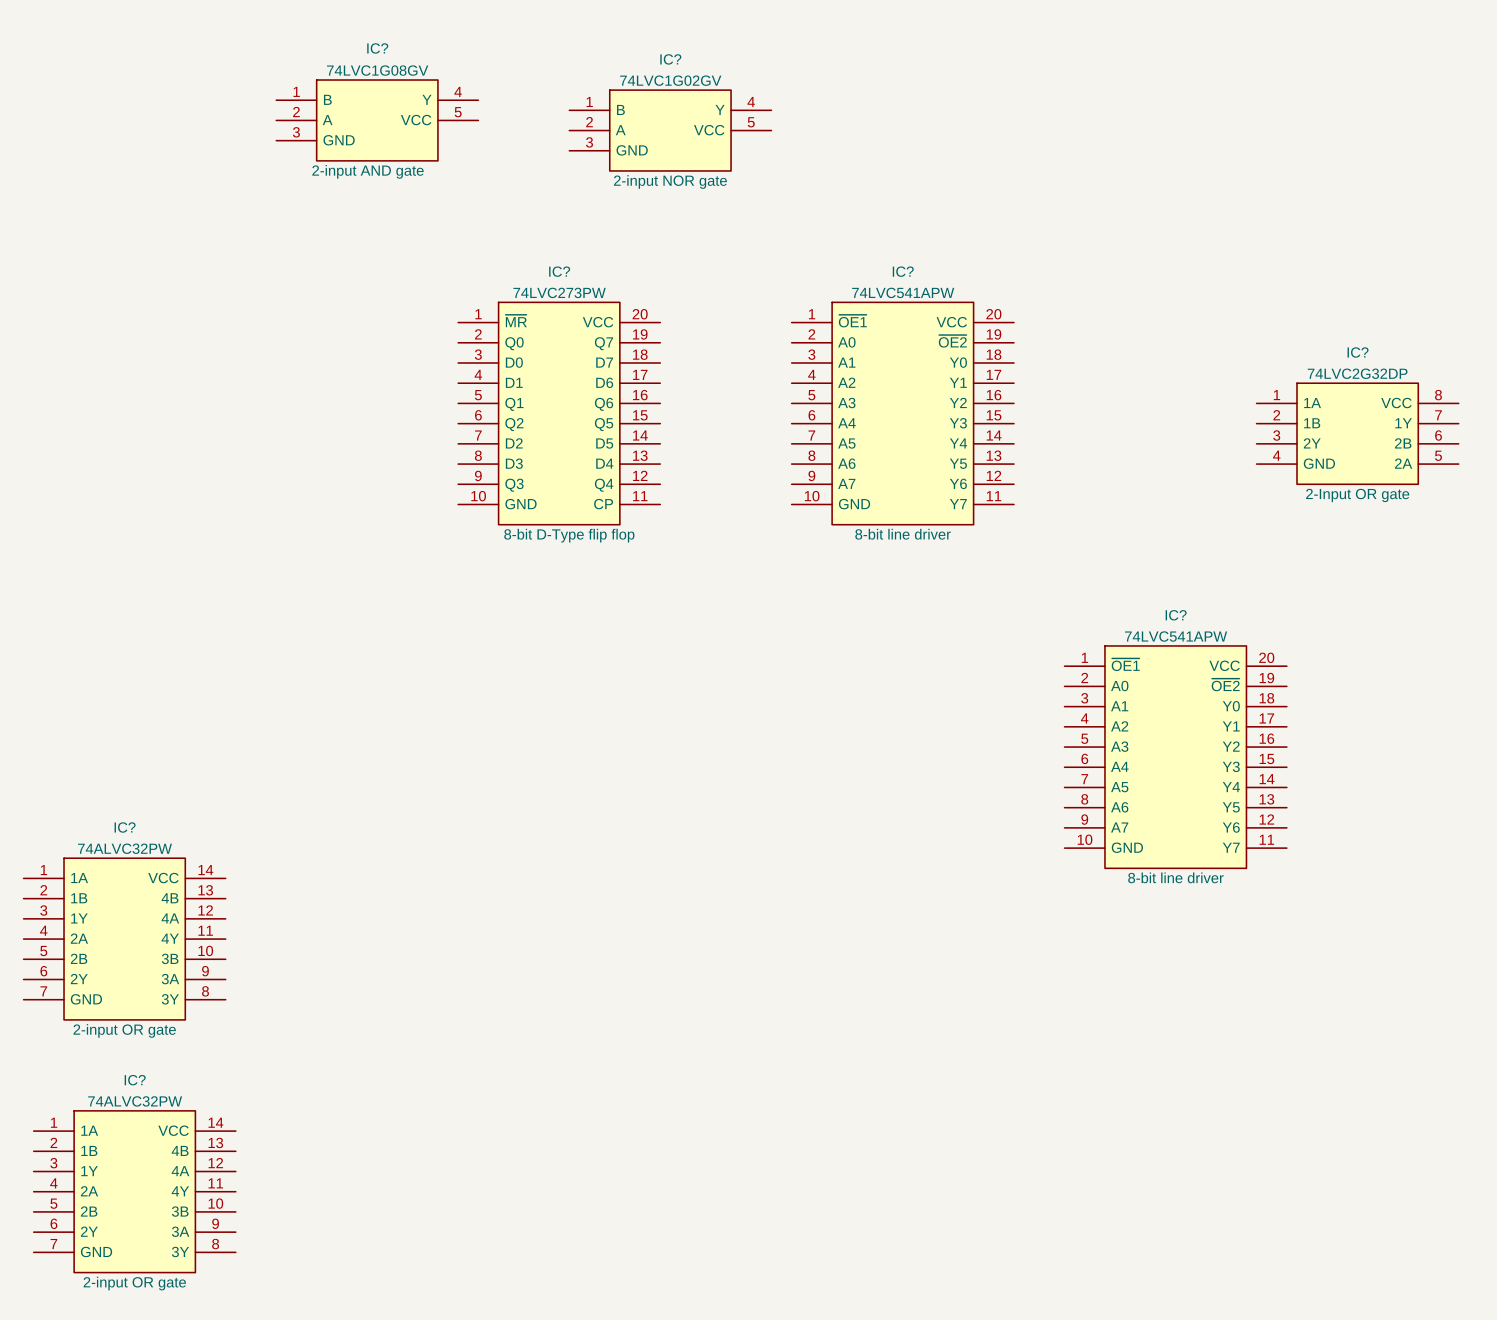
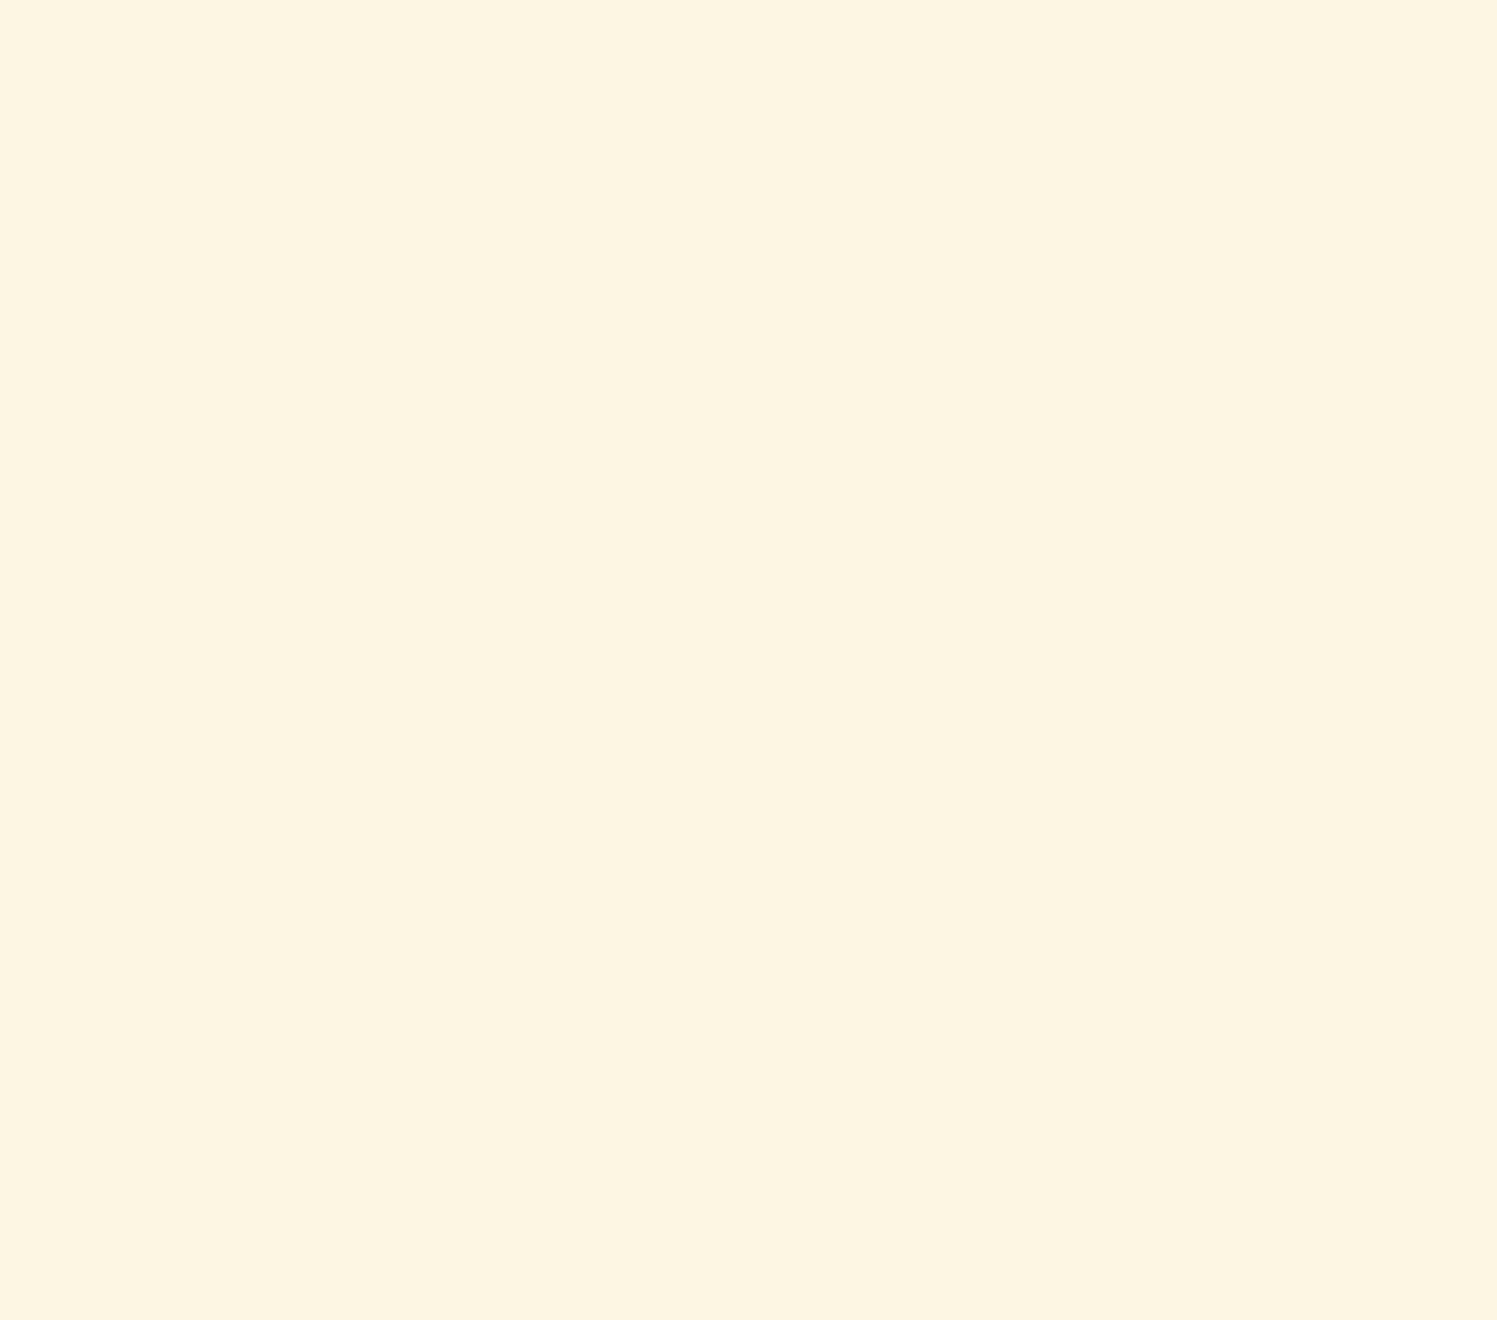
IC?: (377, 120) -> none
IC?: (670, 130) -> none
IC?: (559, 413) -> none
IC?: (902, 413) -> none
IC?: (1357, 433) -> none
IC?: (1175, 757) -> none
IC?: (124, 939) -> none
IC?: (134, 1191) -> none

